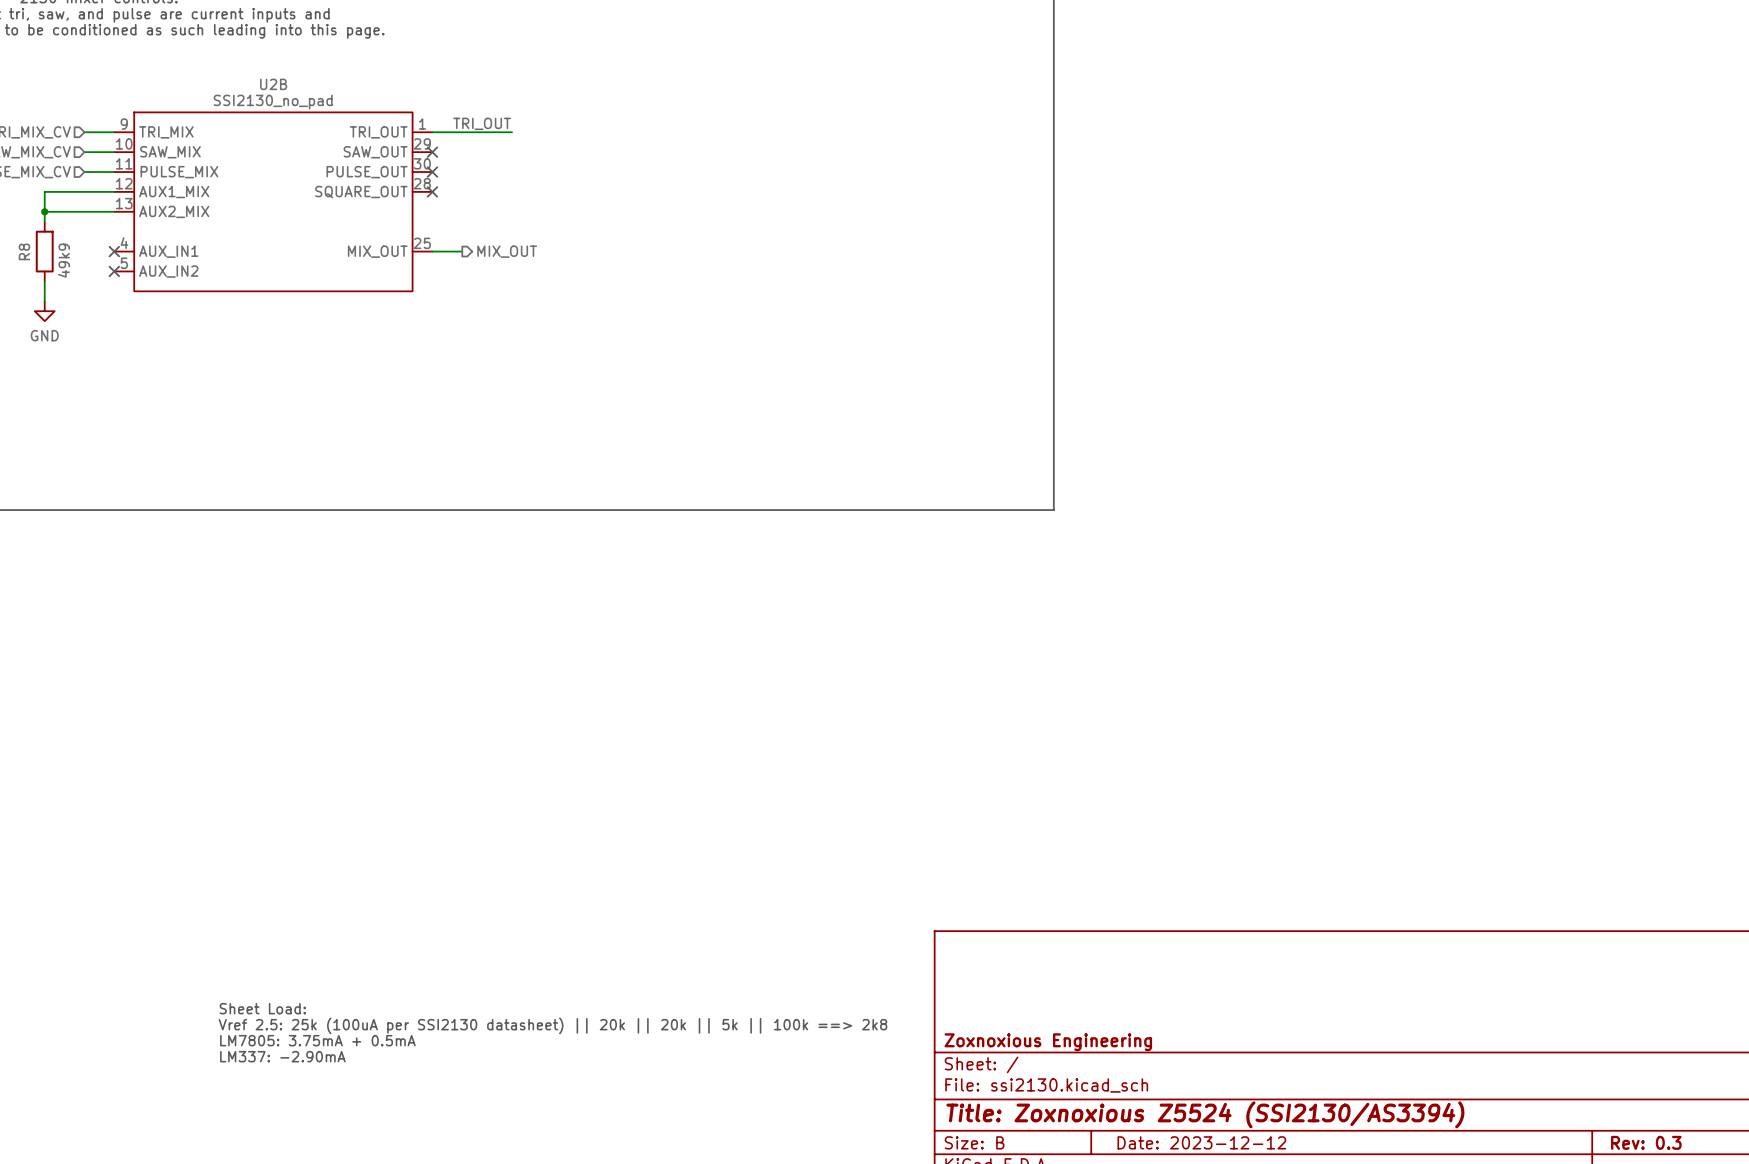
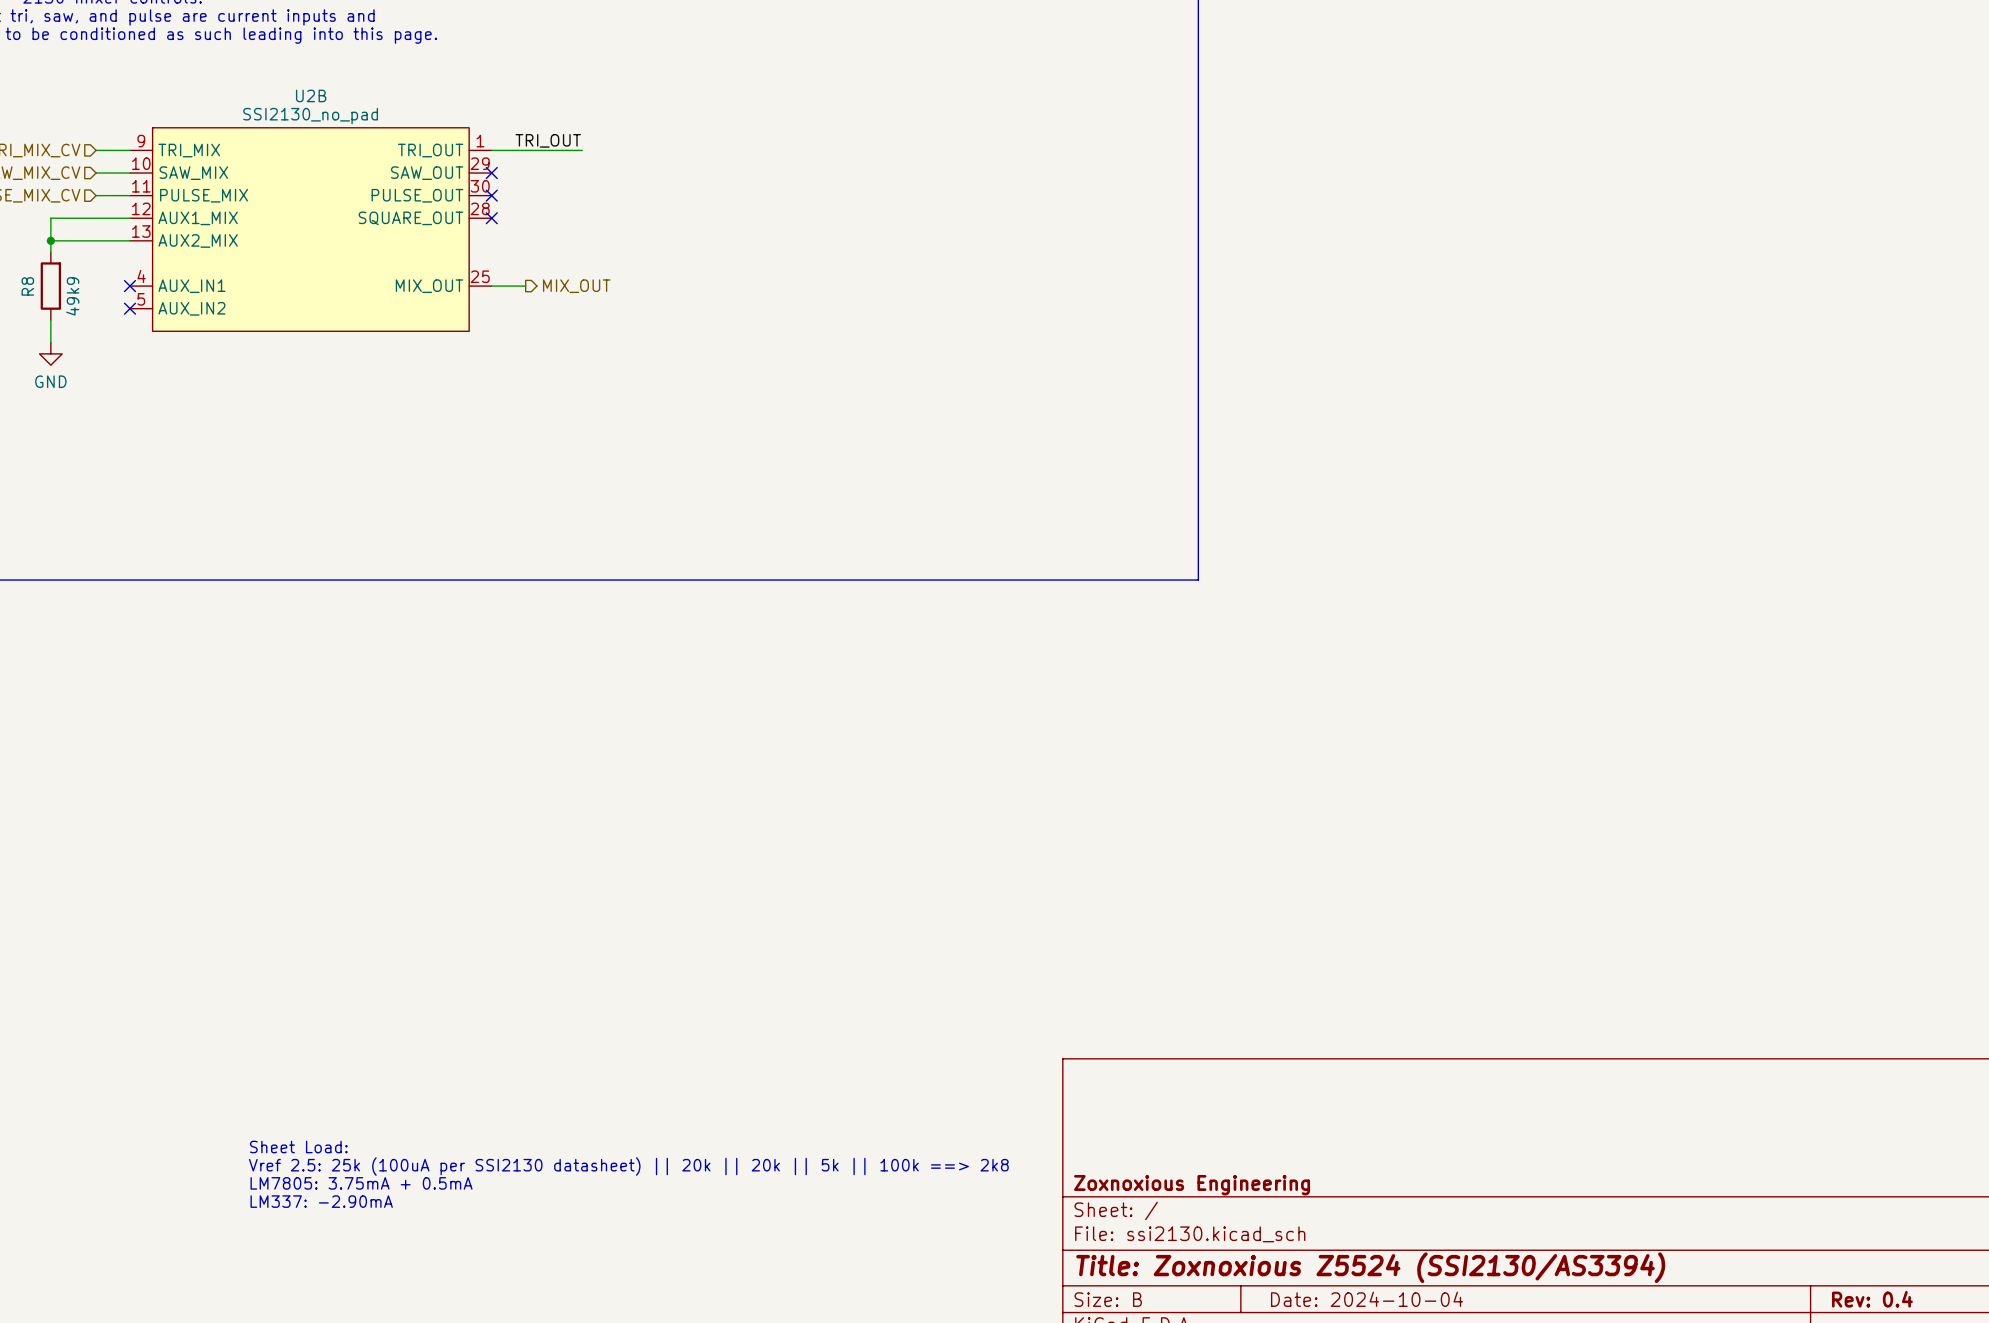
title block: Date: 2023-12-12 (1201, 1142) -> Date: 2024-10-04 (1367, 1299)
title block: Rev: 0.3 (1646, 1142) -> Rev: 0.4 (1872, 1299)

